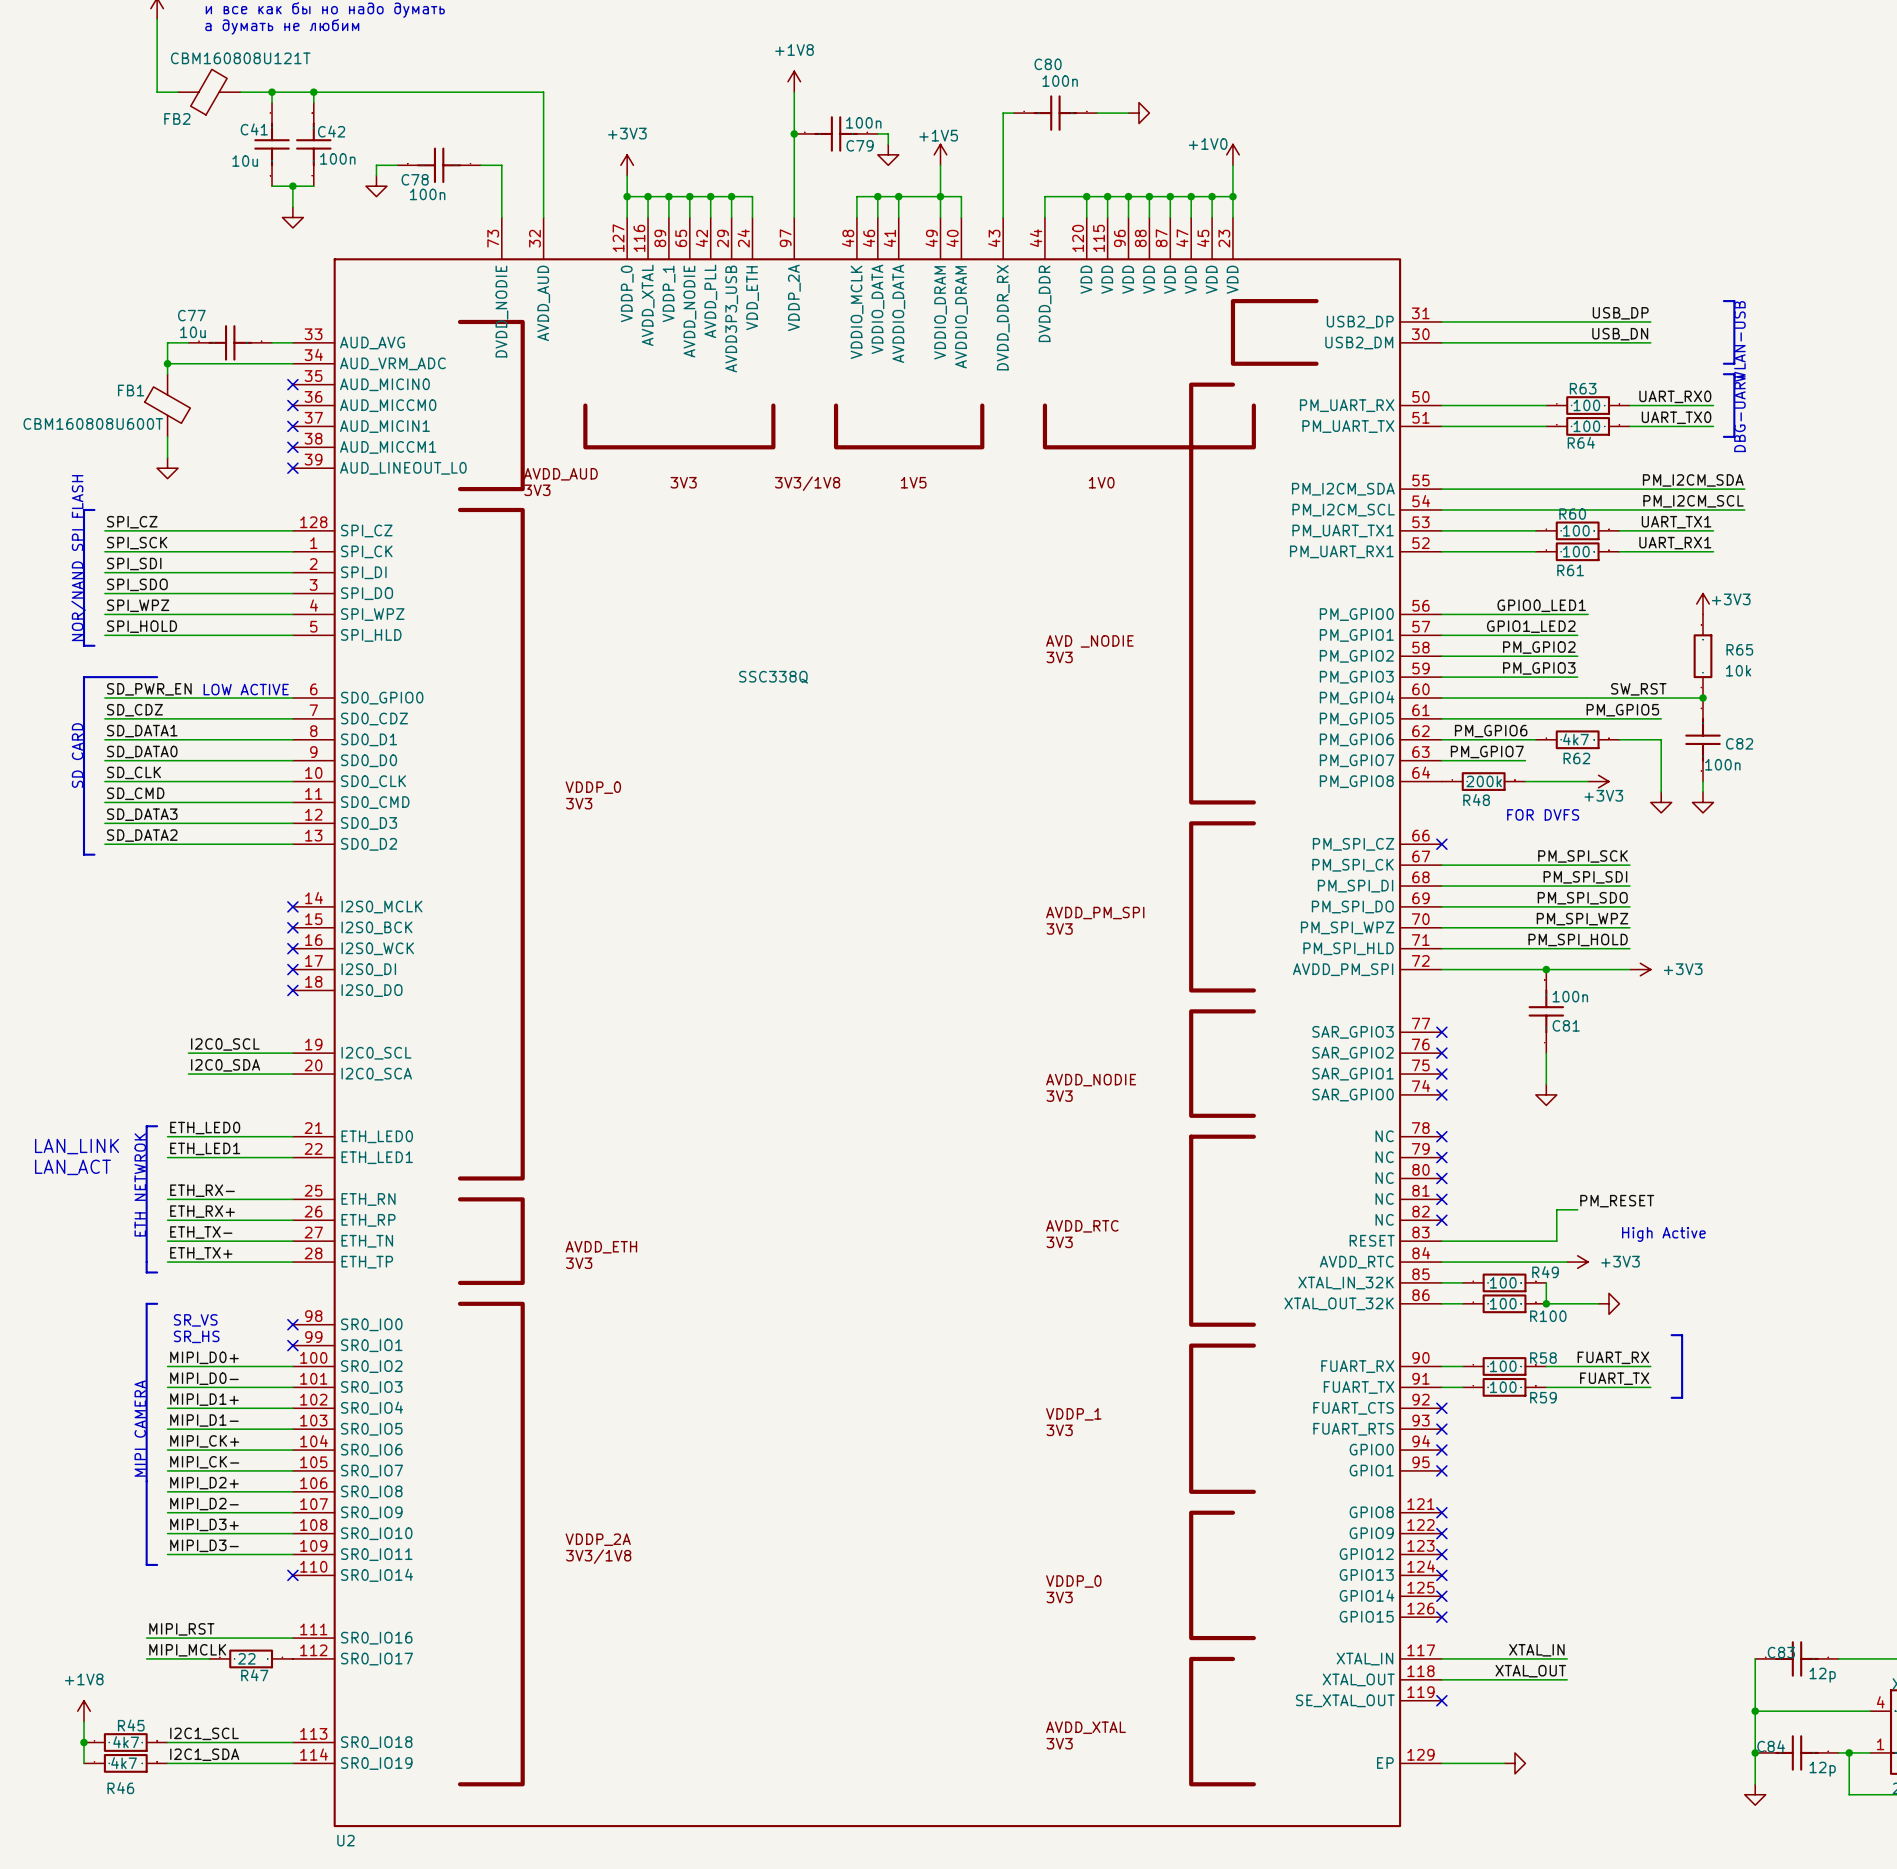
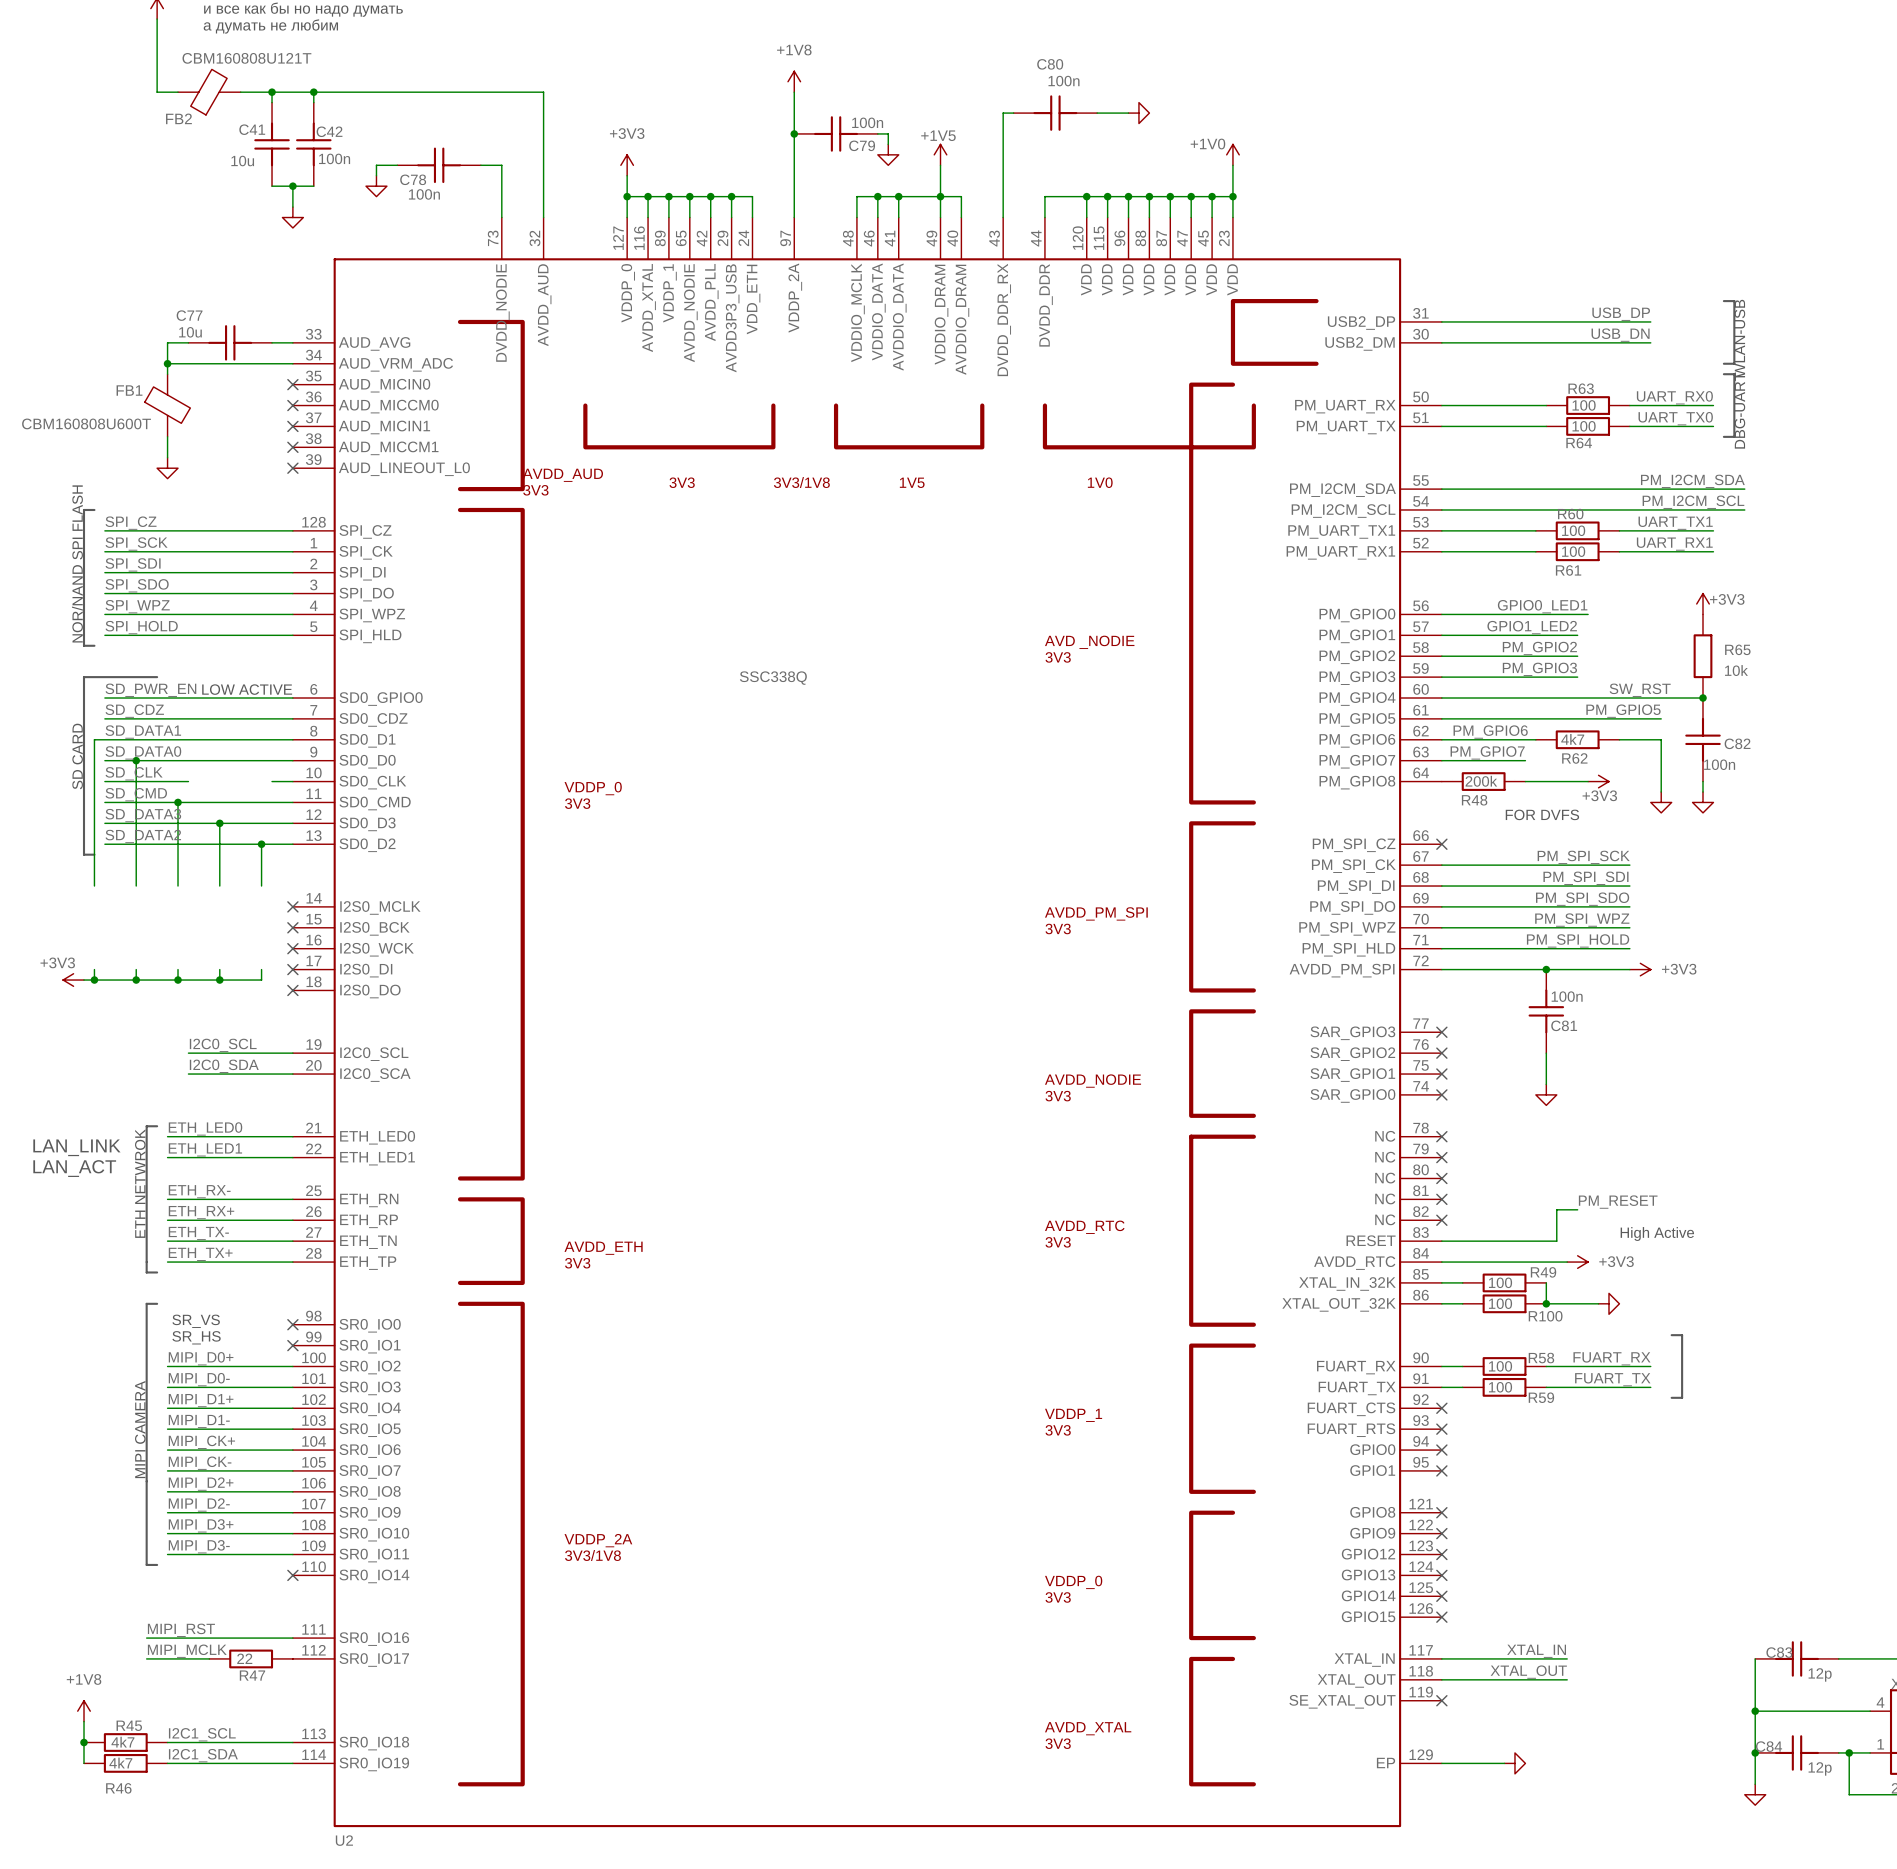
wire: none -> (104, 739) (94, 739) (94, 886)
wire: none -> (136, 760) (136, 886)
junction: none -> (136, 760)
wire: (188, 781) (272, 781) -> none
wire: none -> (178, 802) (178, 886)
junction: none -> (178, 802)
wire: none -> (219, 823) (219, 886)
junction: none -> (219, 823)
wire: none -> (261, 844) (261, 886)
junction: none -> (261, 844)
wire: none -> (94, 969) (94, 980)
wire: none -> (136, 969) (136, 980)
wire: none -> (178, 969) (178, 980)
wire: none -> (219, 969) (219, 980)
wire: none -> (261, 969) (261, 980) (84, 980)
power symbol: none -> +3V3 (73, 980)
junction: none -> (94, 980)
junction: none -> (136, 980)
junction: none -> (178, 980)
junction: none -> (219, 980)

